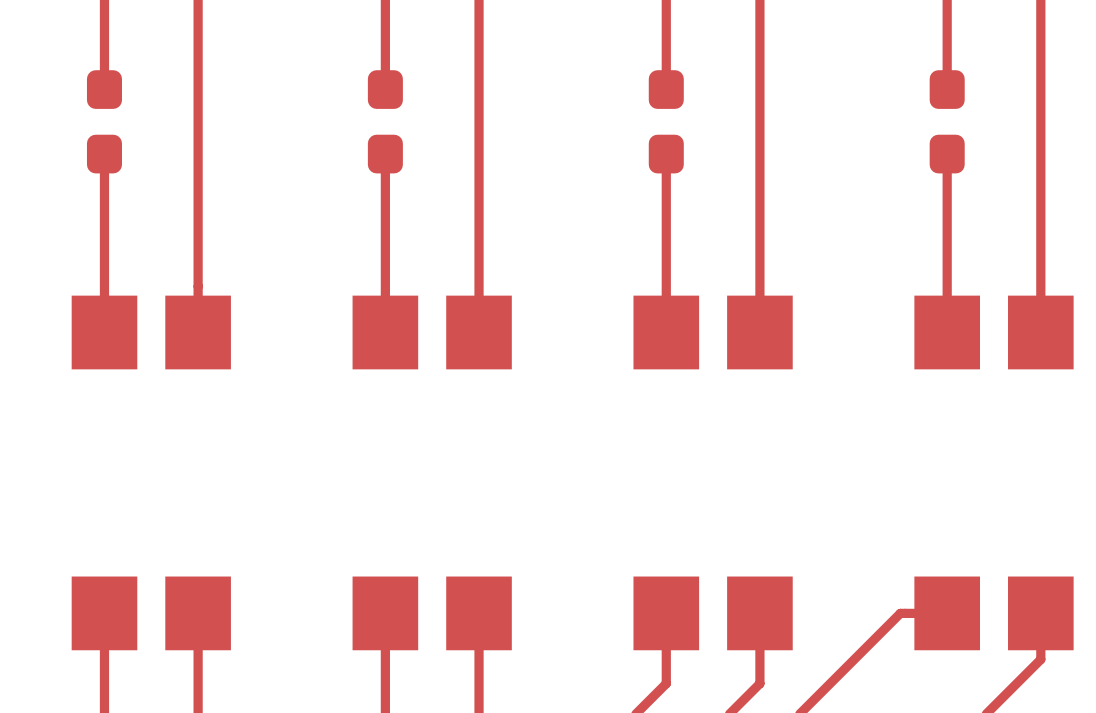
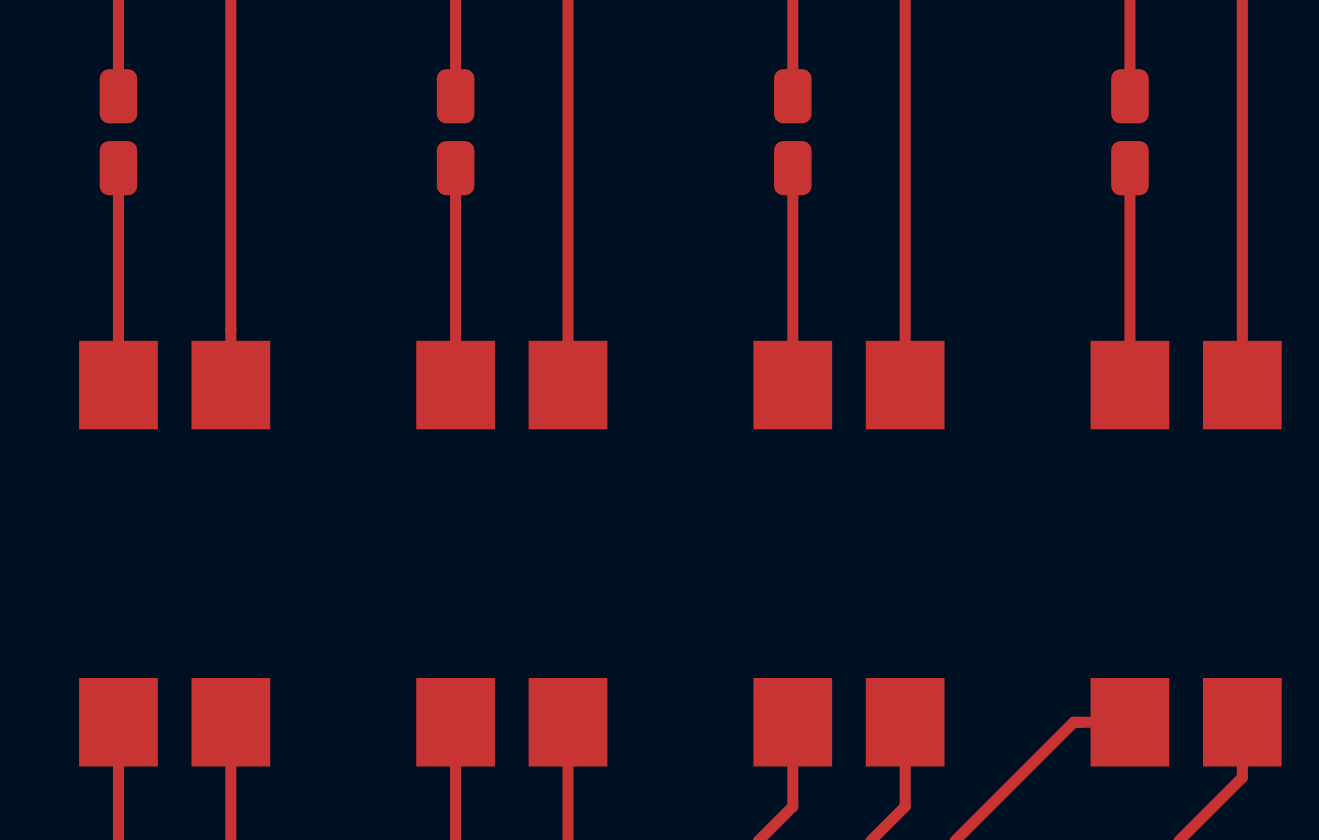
part footprint: [86, 70, 122, 174] -> [99, 69, 138, 196]
part footprint: [367, 70, 403, 174] -> [436, 69, 475, 196]
part footprint: [648, 70, 684, 174] -> [773, 69, 812, 196]
part footprint: [929, 70, 965, 174] -> [1111, 69, 1149, 196]

